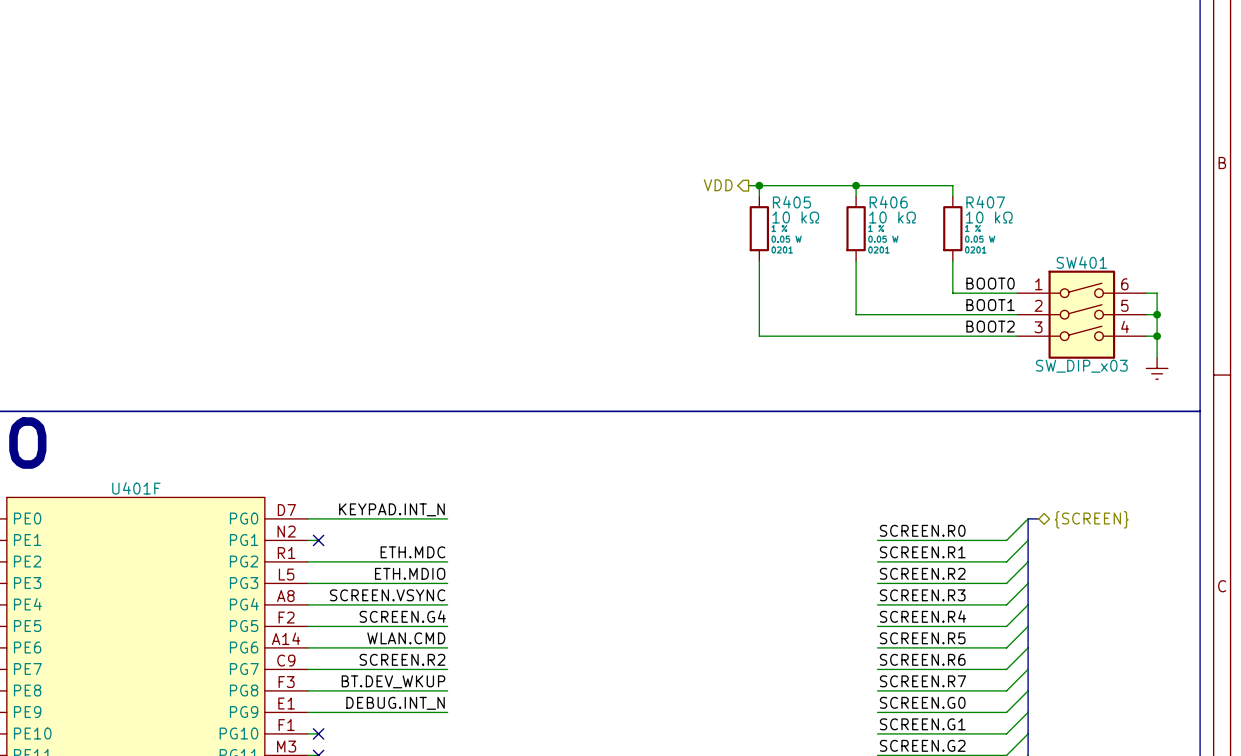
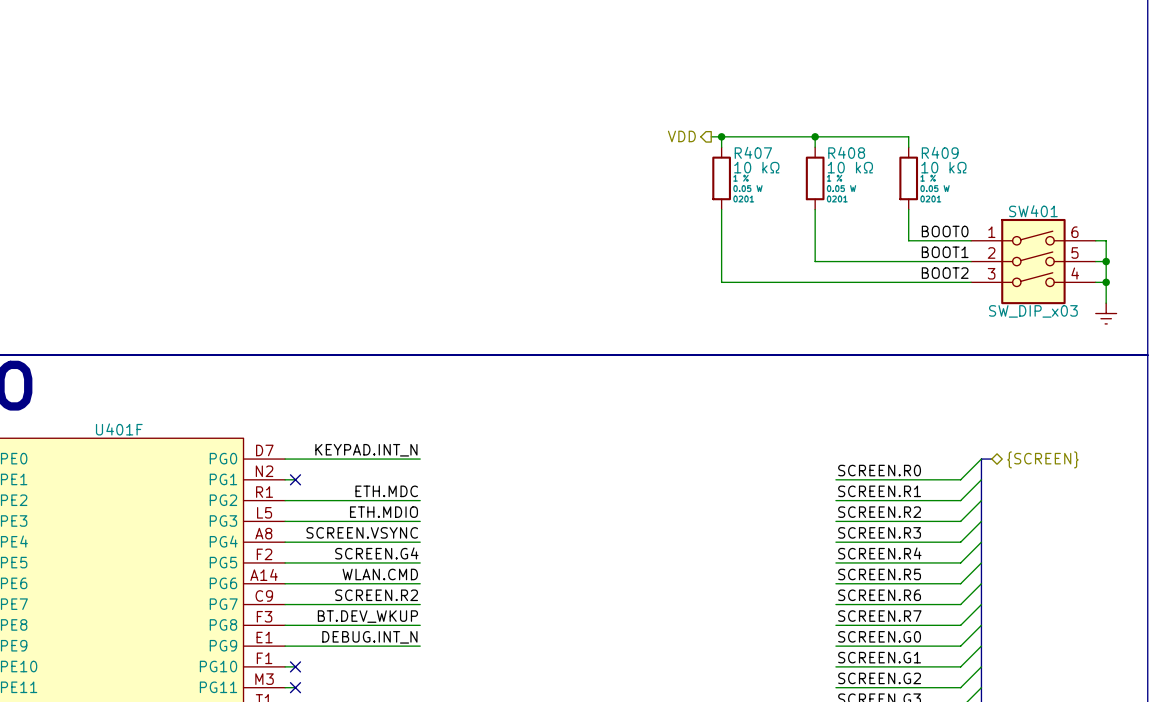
R405 name: R405 (791, 202) -> R407 (753, 152)
R406 name: R406 (888, 202) -> R408 (846, 152)
R407 name: R407 (985, 202) -> R409 (940, 152)

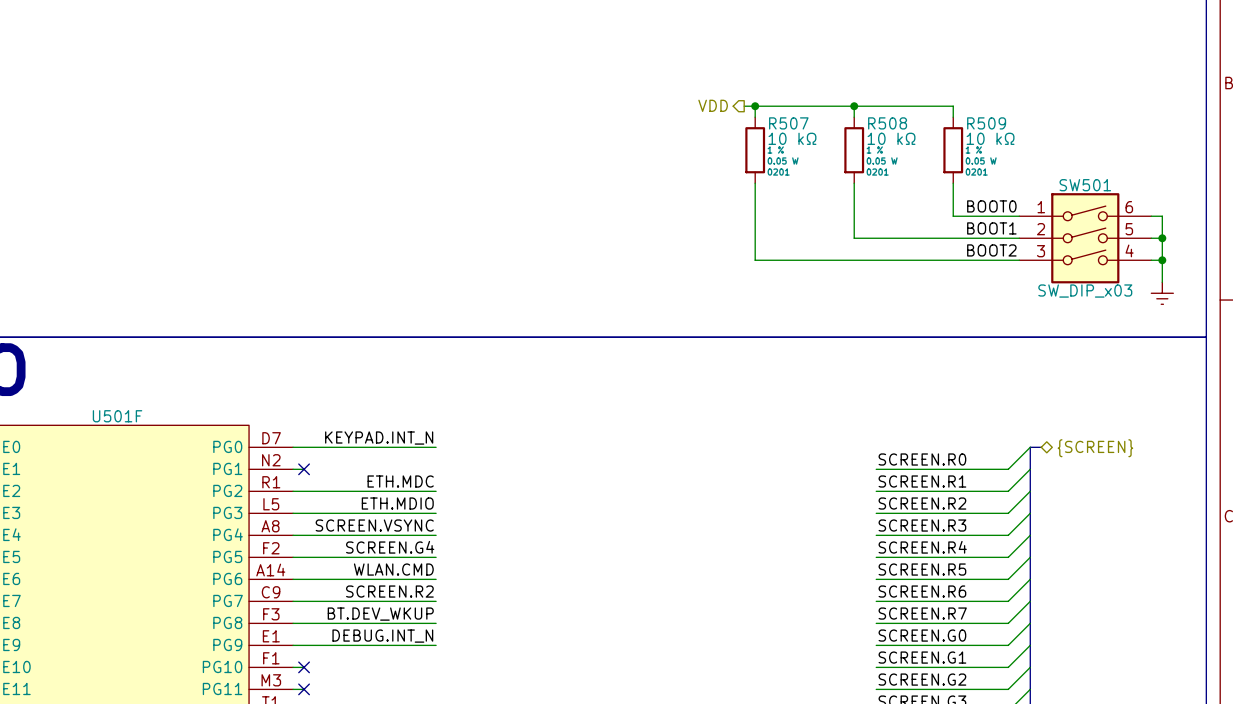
R407 name: R407 (753, 152) -> R507 (788, 123)
R408 name: R408 (846, 152) -> R508 (887, 123)
R409 name: R409 (940, 152) -> R509 (986, 123)
SW401 name: SW401 (1033, 211) -> SW501 (1085, 185)
U401F name: U401F (119, 429) -> U501F (117, 416)

